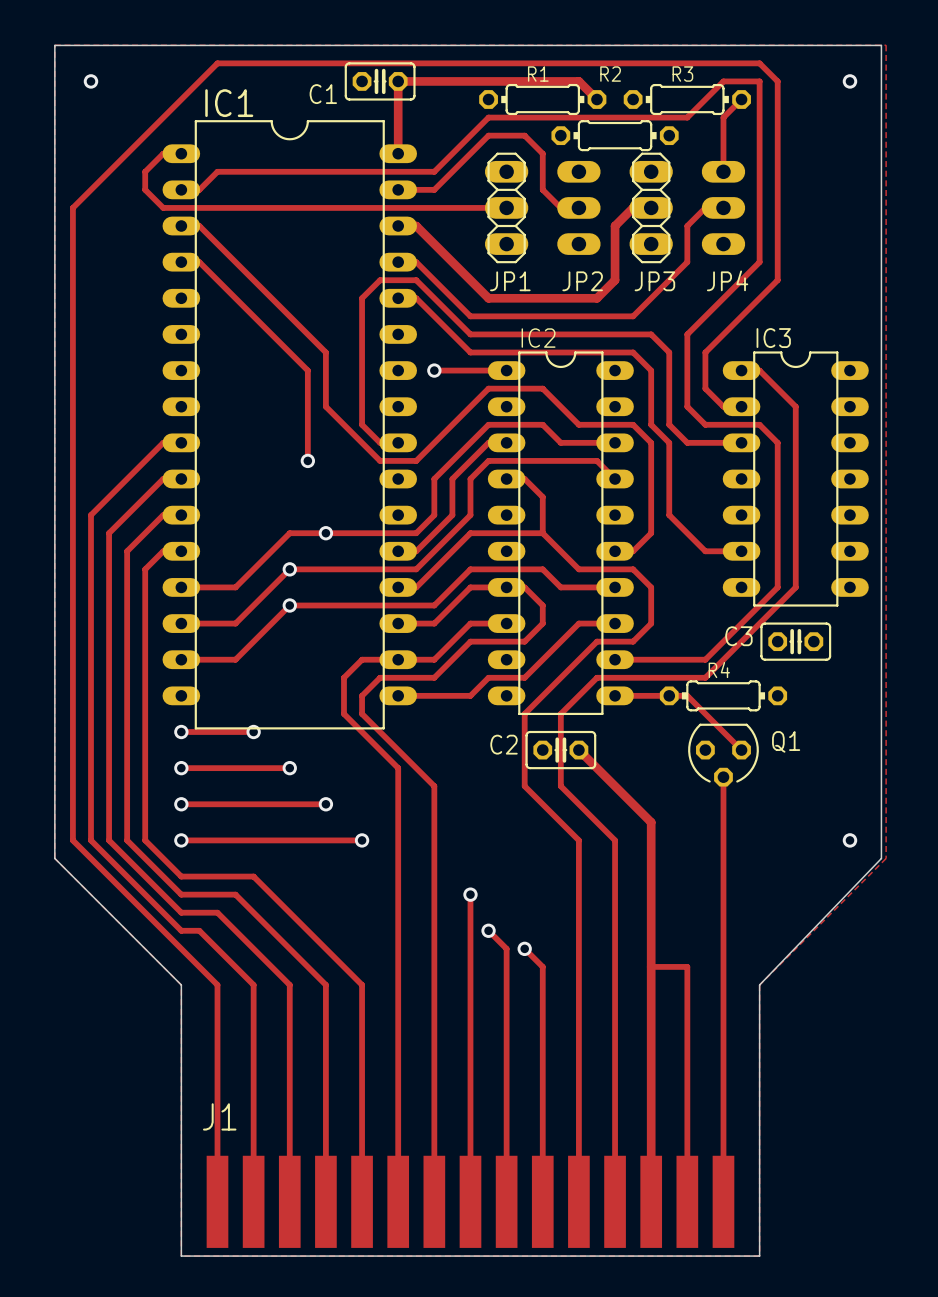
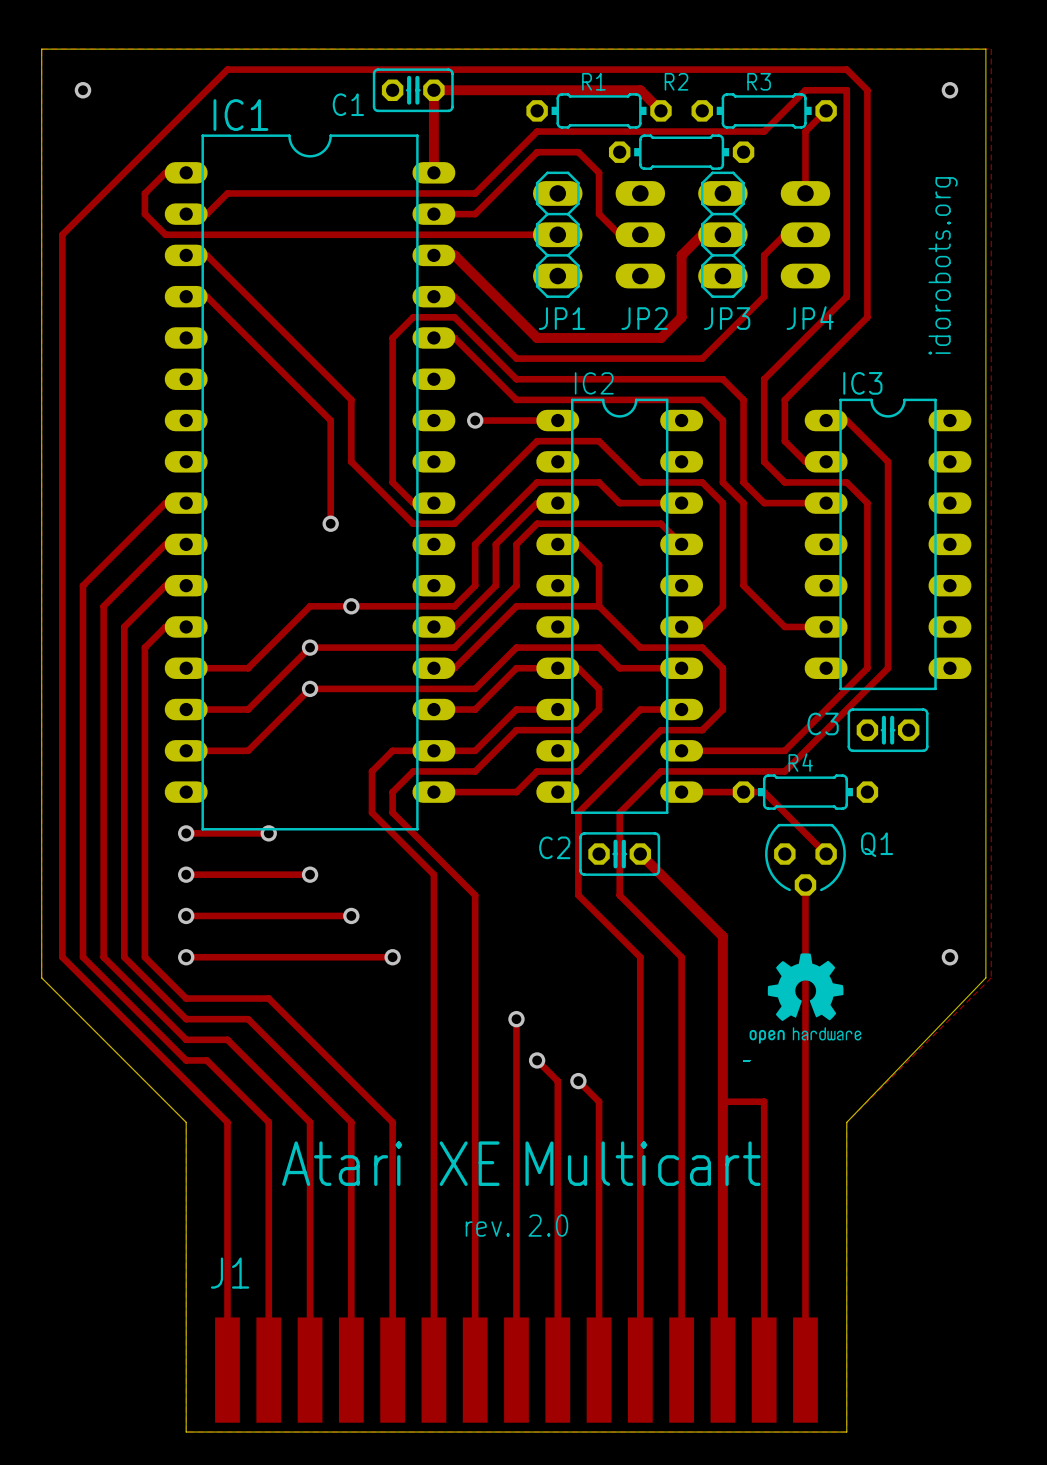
text: none -> idorobots.org (943, 265)
drawing: none -> [749, 953, 862, 1044]
text: none -> Atari XE (390, 1163)
text: none -> Multicart (642, 1163)
text: none -> rev. 2.0 (516, 1225)

